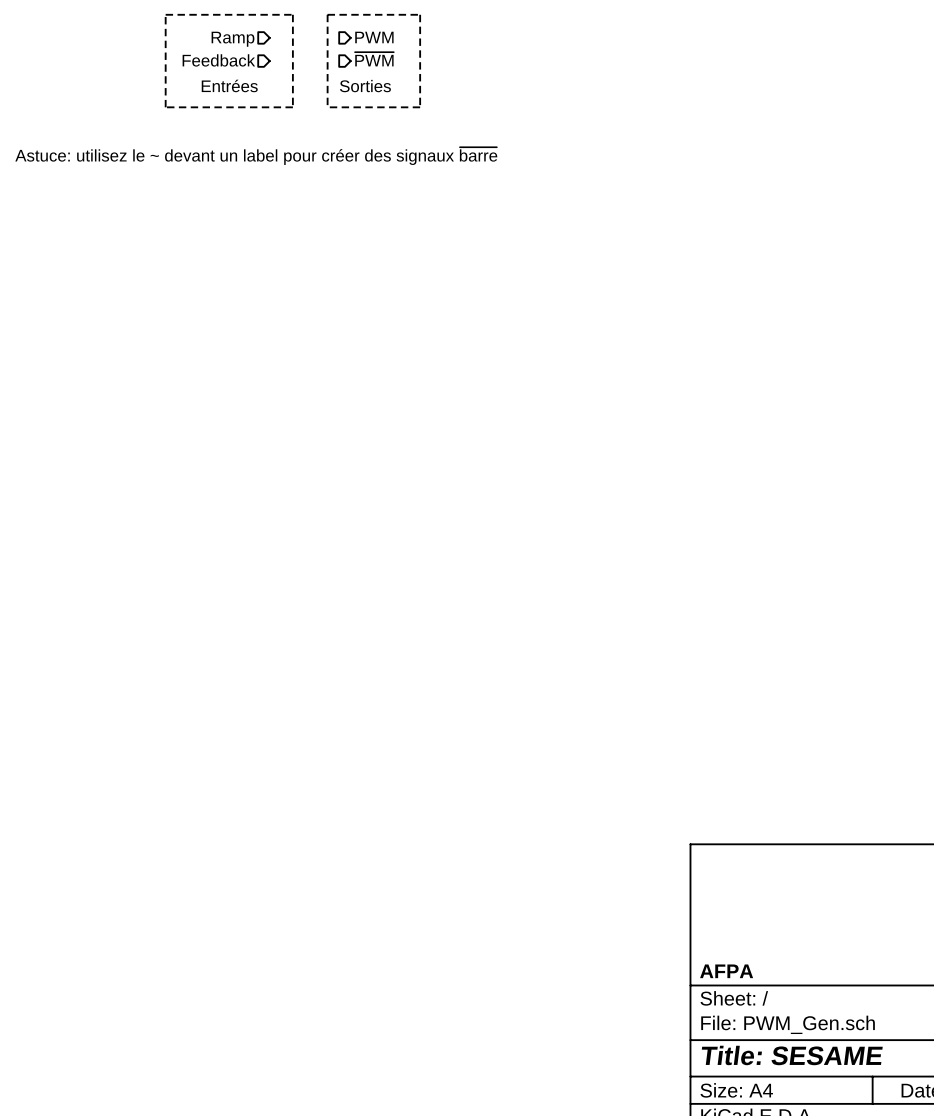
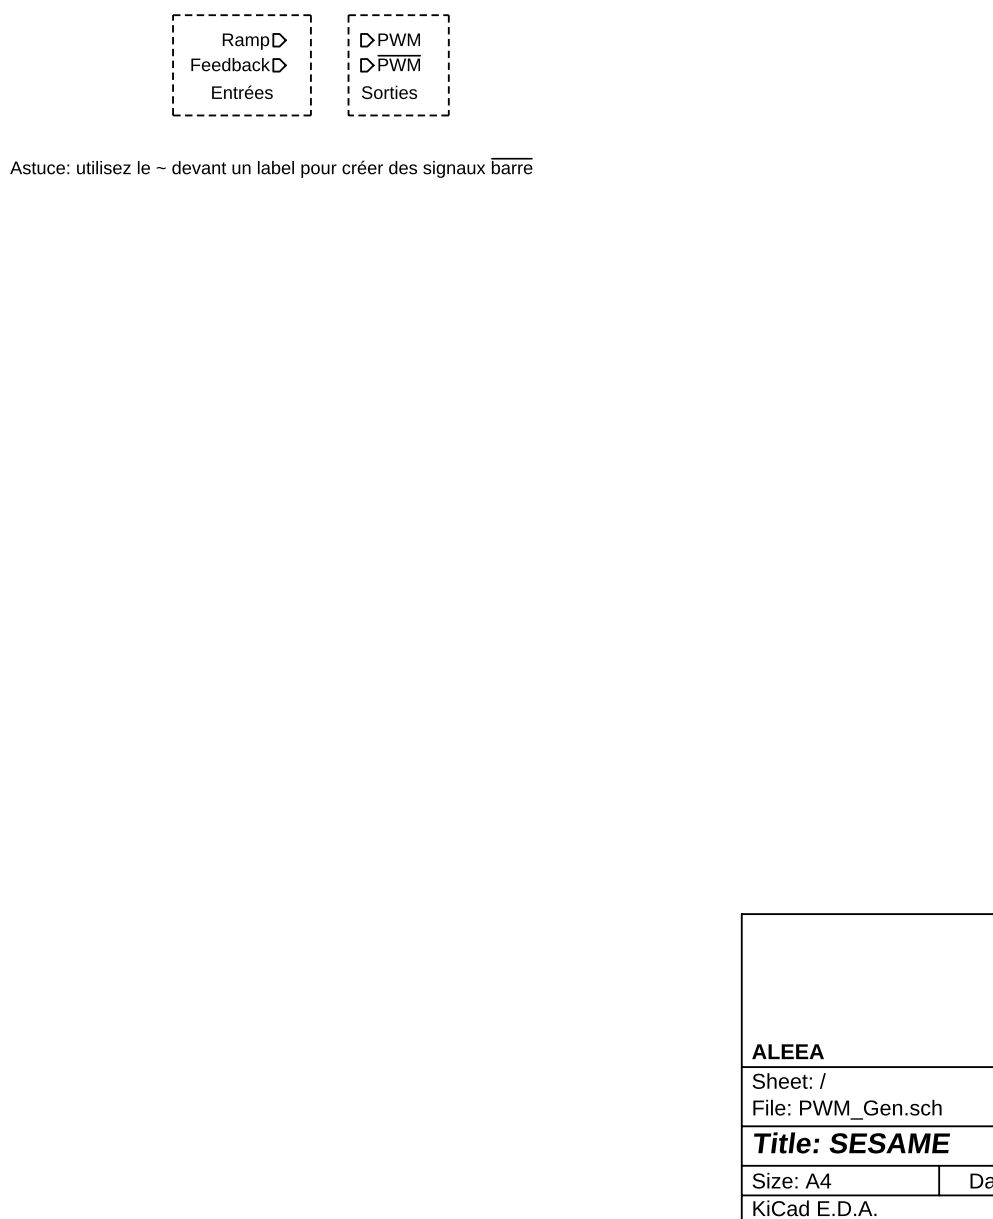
title block: AFPA (726, 971) -> ALEEA (788, 1051)

